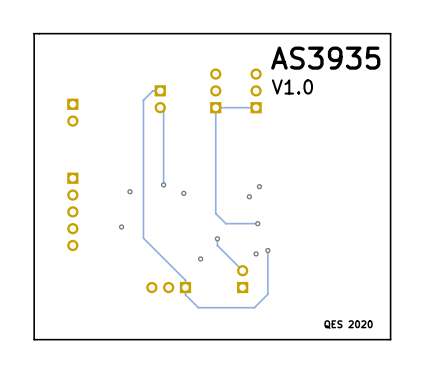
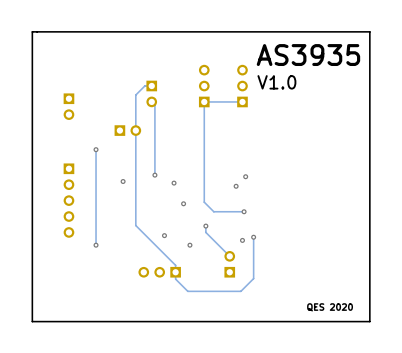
part: none -> (127, 130)
track: none -> (96, 149) (96, 245)
via: none -> (96, 149)
via: none -> (183, 203)
via: (121, 227) -> none
via: none -> (164, 235)
via: none -> (96, 245)

